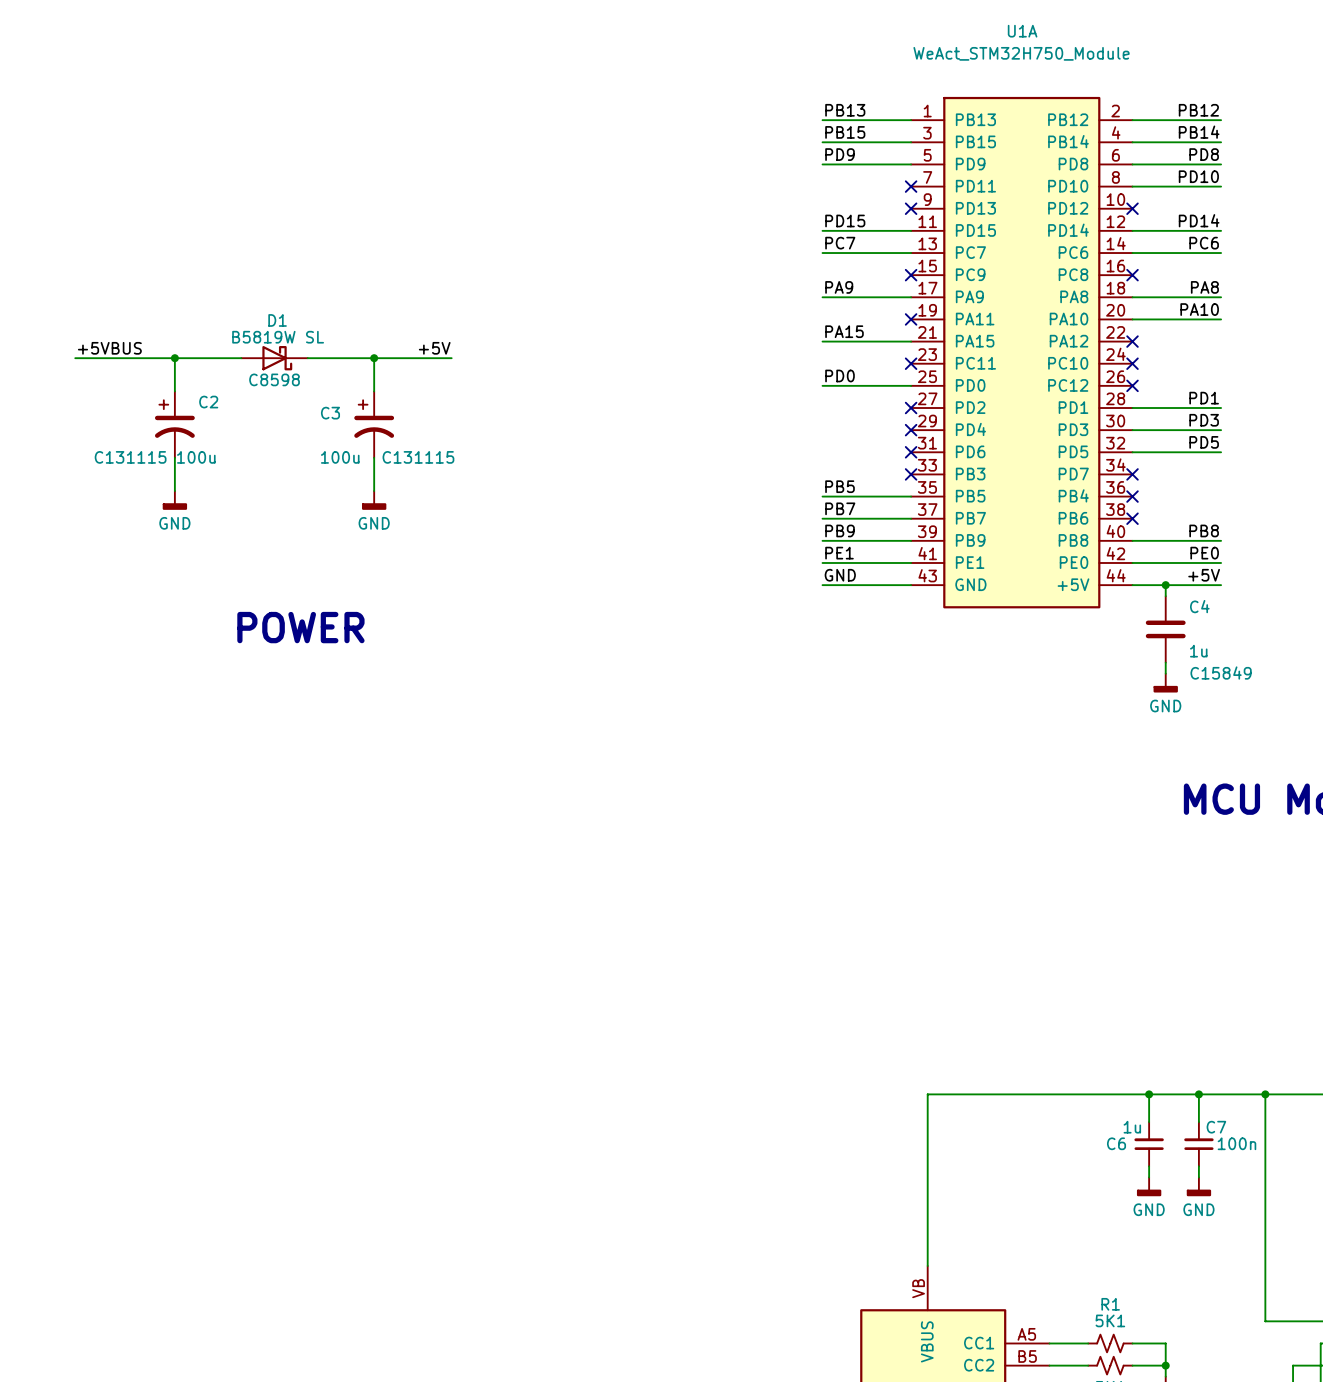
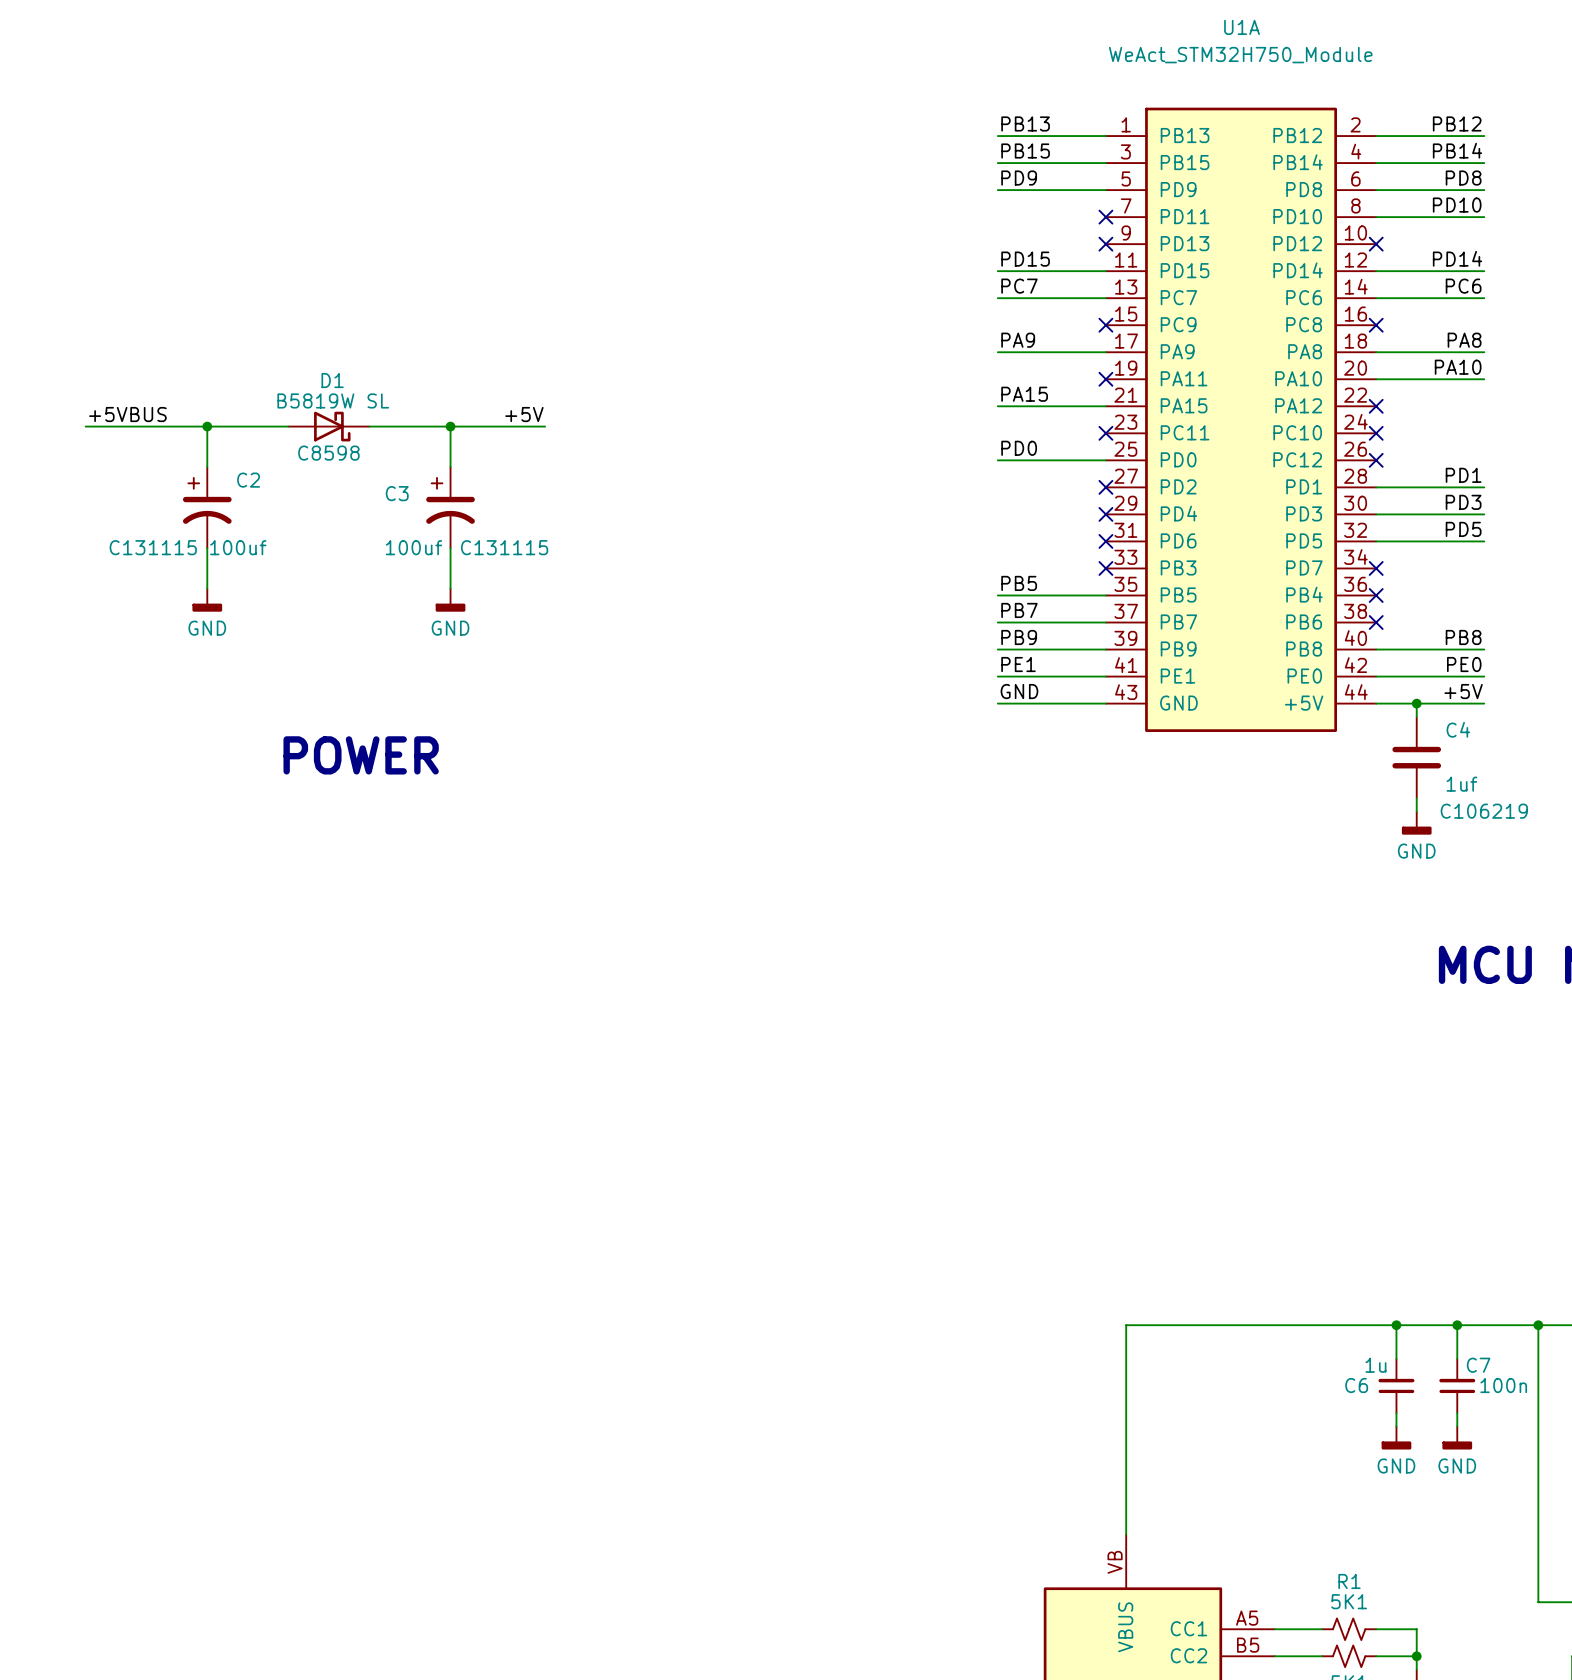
C2 value: 100u (196, 457) -> 100uf (238, 547)
C3 value: 100u (340, 457) -> 100uf (413, 547)
C4 value: 1u (1198, 651) -> 1uf (1461, 784)
C4 text: C15849 (1221, 673) -> C106219 (1484, 811)

